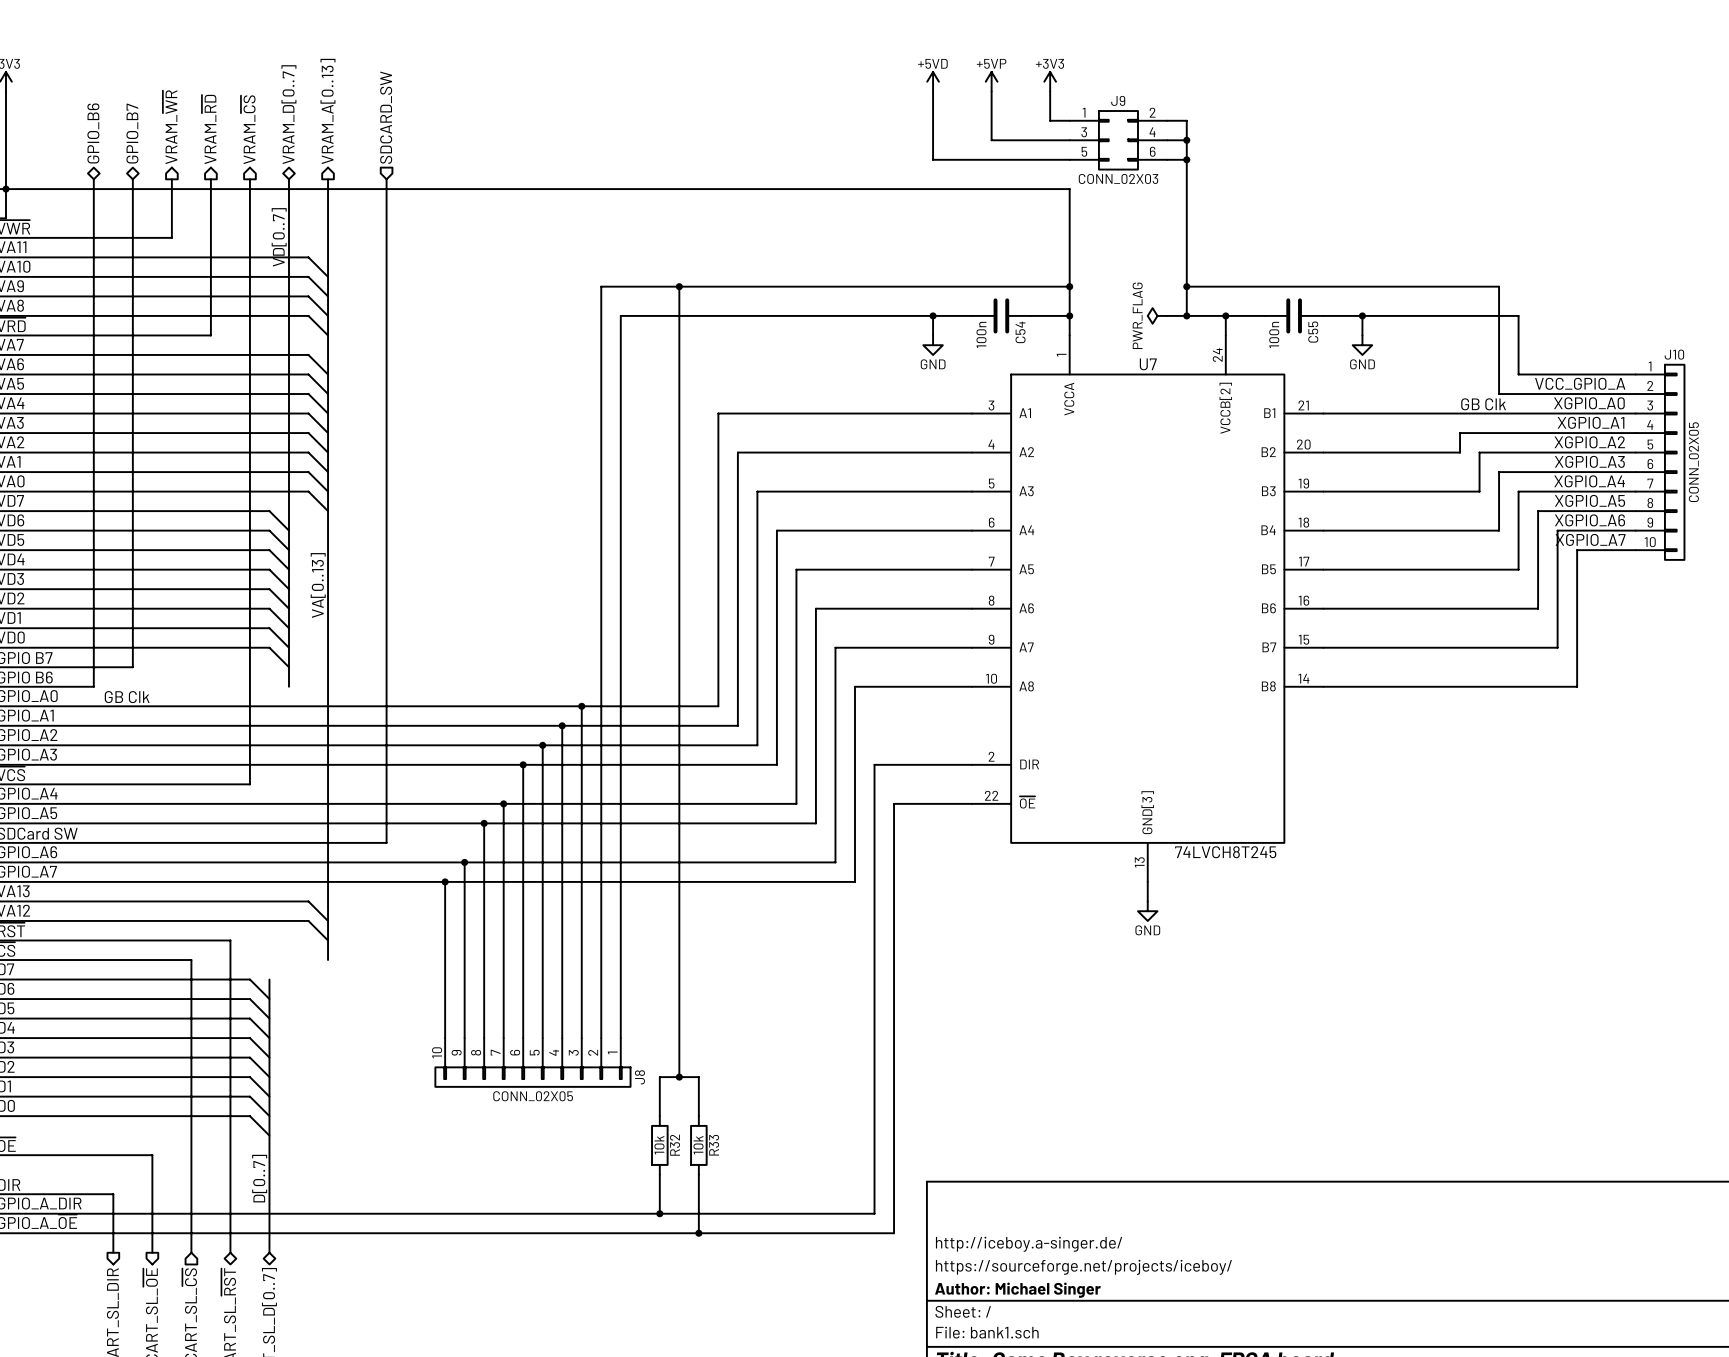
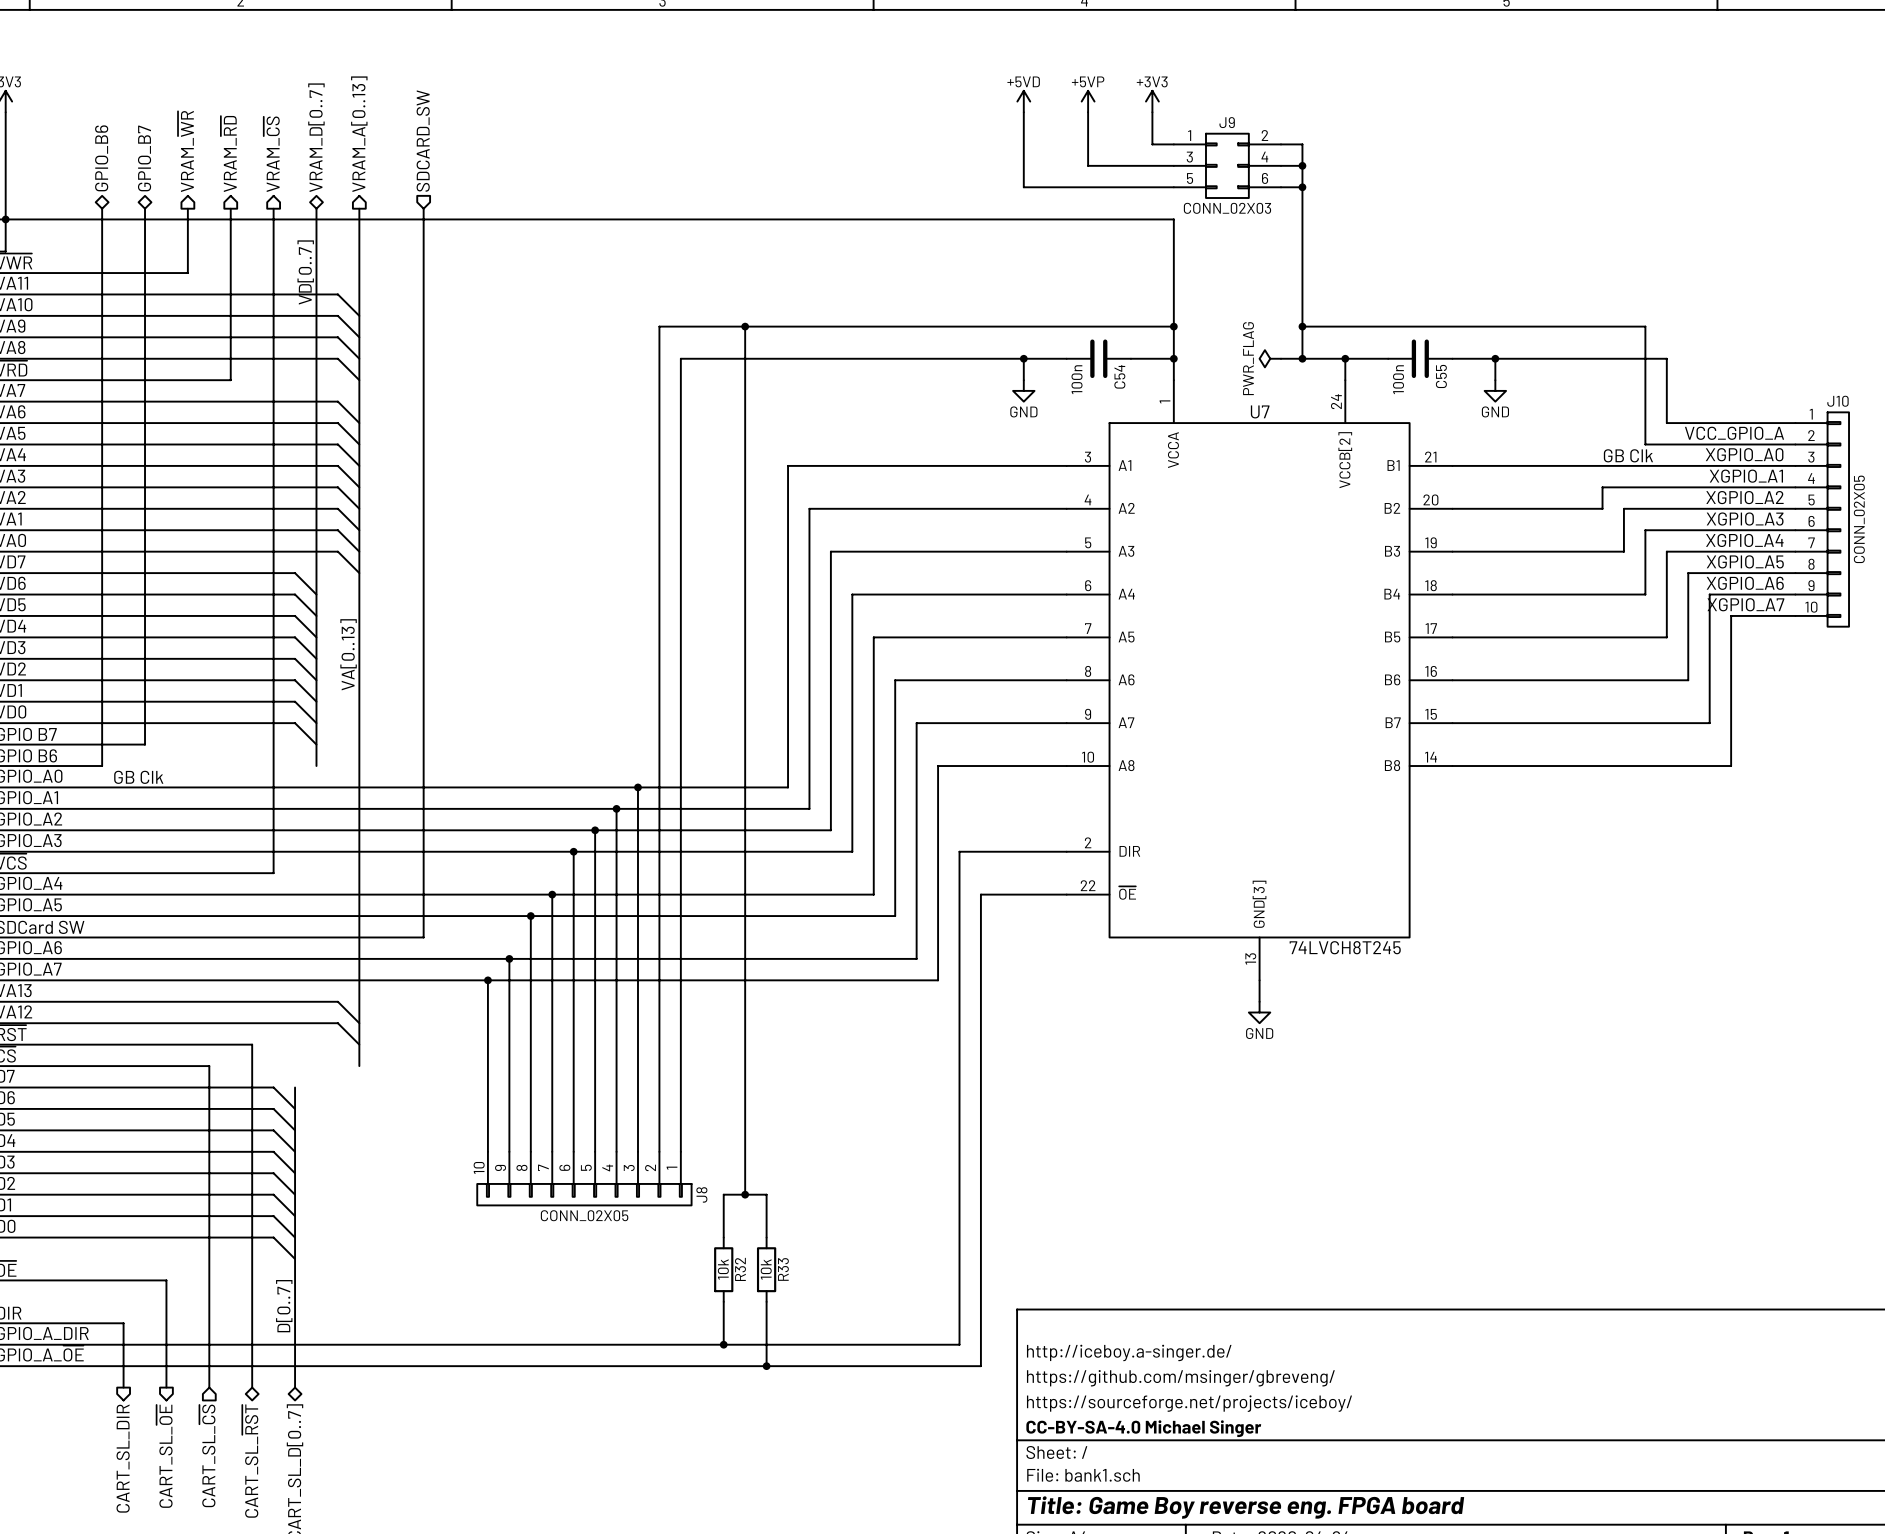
title block: none -> http://iceboy.a-singer.de/ (1129, 1352)
title block: http://iceboy.a-singer.de/ (1029, 1244) -> https://github.com/msinger/gbreveng/ (1180, 1378)
title block: Author: Michael Singer (1017, 1290) -> CC-BY-SA-4.0 Michael Singer (1143, 1428)

